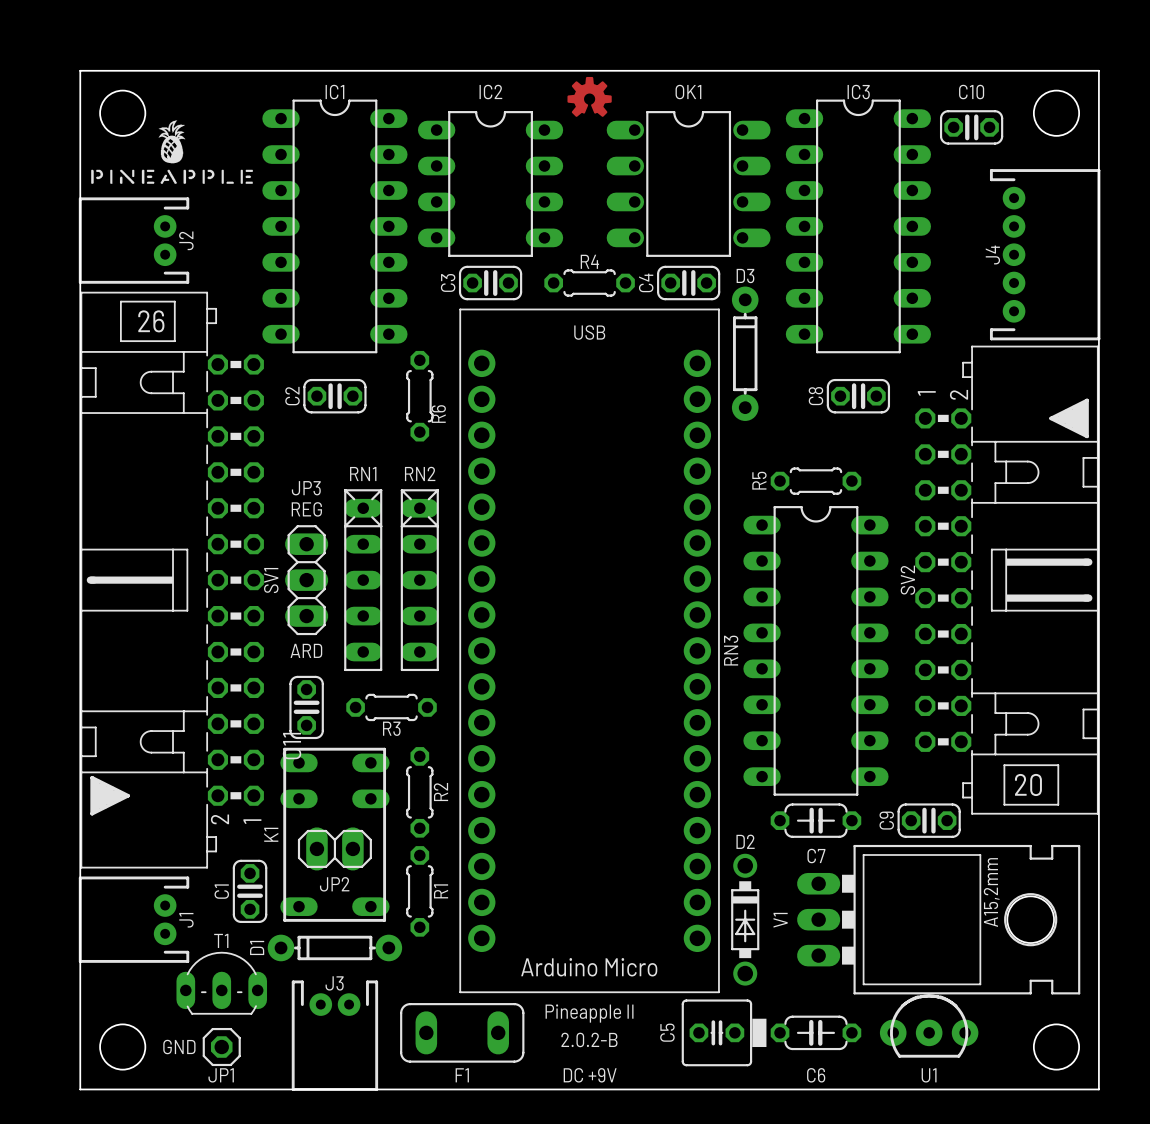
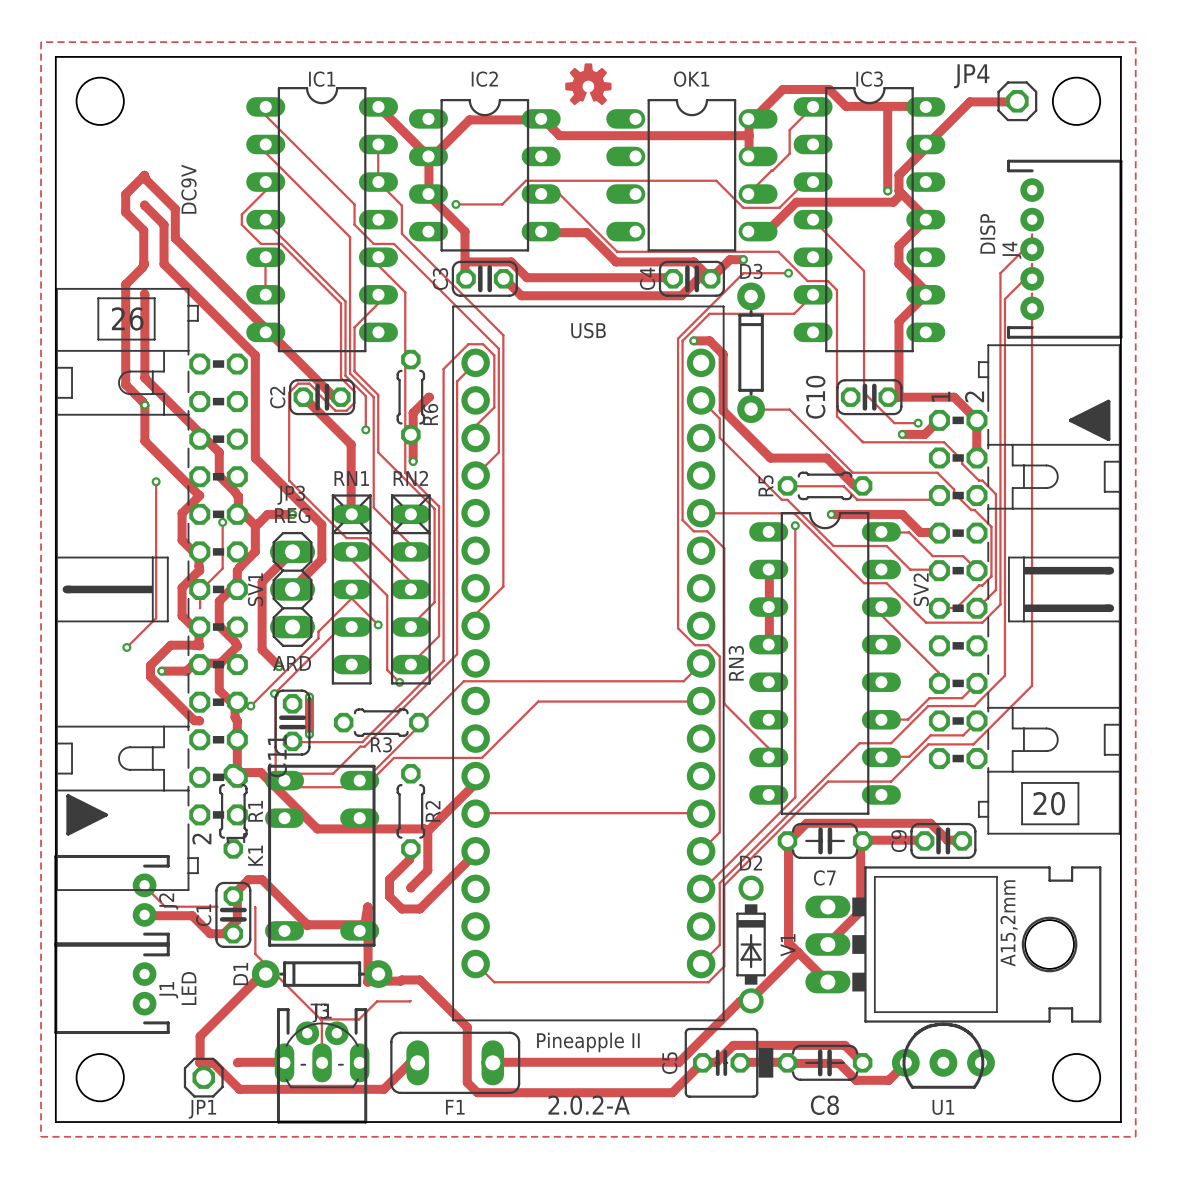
zone outline: none -> (41, 42) (1135, 42) (1135, 1136) (41, 1136) (41, 42)
track: none -> (1017, 101) (970, 101) (924, 144) (924, 149) (898, 175) (898, 190) (925, 219) (898, 246) (898, 264) (924, 290) (925, 294) (898, 321) (898, 397)
JP4: none -> (1017, 101)
track: none -> (265, 106) (266, 116) (354, 204) (354, 224) (373, 243) (393, 243) (498, 348) (498, 452) (475, 475)
track: none -> (378, 106) (428, 156)
track: none -> (813, 106) (789, 130) (789, 153) (748, 194)
track: none -> (887, 106) (887, 190)
track: none -> (925, 106) (846, 106) (829, 89) (782, 89) (753, 118) (748, 118) (748, 156)
drawing: [91, 120, 253, 184] -> none
C10: (971, 127) -> none
track: none -> (749, 135) (559, 135) (541, 118) (469, 119) (433, 155) (428, 156)
track: none -> (265, 144) (266, 153) (350, 237) (350, 373) (373, 397) (373, 507) (409, 543) (410, 551)
track: none -> (378, 144) (378, 181)
track: none -> (428, 156) (428, 194) (465, 231) (466, 278)
track: none -> (265, 182) (265, 190) (241, 214) (241, 224) (260, 243) (281, 243) (341, 303) (341, 378) (354, 391) (354, 402) (346, 410) (335, 410) (309, 383) (298, 383) (289, 392) (289, 480) (346, 538) (366, 538) (409, 580) (410, 589)
track: none -> (378, 182) (401, 205) (401, 233) (503, 335) (503, 586) (476, 613) (475, 625)
track: none -> (813, 182) (804, 183) (779, 207) (743, 207) (716, 180) (525, 180) (502, 204) (455, 204)
text: none -> DC9V (188, 189)
via: none -> (887, 190)
track: none -> (541, 194) (559, 194) (617, 251) (778, 251) (807, 281) (827, 281) (836, 290) (836, 416) (862, 442) (944, 442) (979, 480) (982, 480) (995, 494) (995, 589) (976, 608)
track: none -> (901, 193) (893, 202) (796, 202) (767, 231) (748, 231)
via: none -> (455, 204)
track: none -> (144, 204) (164, 224) (164, 264) (255, 355) (255, 458) (321, 524) (321, 559) (292, 589)
track: none -> (265, 219) (345, 301) (345, 375) (365, 396) (365, 429)
track: none -> (813, 219) (864, 270) (864, 392) (894, 423) (918, 423)
track: none -> (541, 231) (586, 232) (616, 261) (693, 261) (710, 278)
J2 position: (134, 240) -> (112, 900)
text: none -> DISP (987, 233)
track: none -> (1032, 234) (1032, 241) (1000, 273) (1000, 604) (982, 622) (926, 622) (886, 583) (864, 583) (794, 513) (701, 513)
track: none -> (265, 257) (265, 294)
track: none -> (378, 257) (379, 266) (405, 292) (405, 472) (439, 506) (439, 636) (410, 664)
track: none -> (743, 259) (729, 259) (710, 278)
via: none -> (743, 259)
track: none -> (465, 261) (511, 261) (527, 277) (673, 278)
track: none -> (1032, 264) (1032, 272) (1004, 299) (1004, 675) (974, 706) (928, 706) (891, 743) (859, 743) (719, 883) (719, 945) (701, 964)
track: none -> (788, 273) (743, 273) (678, 338) (678, 628) (694, 645) (708, 645) (719, 656) (719, 832) (701, 851)
via: none -> (788, 273)
track: none -> (503, 278) (521, 295) (681, 295) (701, 275) (710, 278)
R4: (589, 283) -> none
track: none -> (144, 293) (144, 378) (219, 452) (219, 476) (238, 496) (238, 508) (255, 525)
track: none -> (1032, 293) (1032, 685) (973, 744) (928, 744) (891, 781) (827, 781) (724, 885) (724, 966) (708, 982) (494, 982) (475, 964)
track: none -> (378, 294) (378, 303) (354, 327) (354, 371) (378, 394) (378, 452) (434, 508) (434, 602) (410, 627)
track: none -> (813, 294) (794, 313) (709, 313) (682, 340) (682, 520) (693, 531) (707, 531) (724, 548) (724, 703) (768, 747) (768, 757)
track: none -> (693, 340) (709, 340) (723, 354) (723, 410) (770, 458) (826, 458) (853, 485) (862, 485)
via: none -> (693, 340)
track: none -> (475, 362) (457, 381) (457, 654) (364, 746) (360, 746) (333, 773) (292, 773)
track: none -> (303, 397) (351, 444) (351, 514)
track: none -> (340, 397) (333, 396) (270, 332) (265, 332) (263, 326) (175, 238) (175, 208) (146, 179) (144, 175) (125, 194) (125, 212) (143, 230) (144, 264) (125, 284) (125, 384) (144, 405) (144, 441) (199, 495) (182, 513) (182, 540) (198, 557) (199, 570) (182, 587) (182, 615) (198, 632) (199, 645) (170, 645) (150, 665) (150, 676) (194, 720) (199, 720)
track: none -> (429, 397) (413, 412) (413, 461)
C8 name: C8 (815, 396) -> C10 (815, 397)
track: none -> (888, 397) (954, 397) (976, 419) (976, 457)
track: none -> (701, 400) (719, 418) (719, 437) (781, 499) (787, 499) (833, 546) (886, 546) (910, 569) (939, 570)
via: none -> (144, 405)
track: none -> (751, 409) (789, 409) (852, 472) (937, 472) (954, 489) (954, 493) (991, 526) (991, 576) (982, 585) (979, 585) (956, 608) (939, 608)
track: none -> (939, 420) (924, 434) (902, 434)
via: none -> (918, 423)
via: none -> (365, 429)
via: none -> (902, 434)
track: none -> (475, 437) (476, 425) (494, 407) (494, 355) (483, 344) (468, 344) (443, 369) (443, 660) (362, 742) (292, 741)
via: none -> (413, 461)
track: none -> (156, 481) (156, 618) (126, 647)
via: none -> (156, 481)
track: none -> (787, 485) (843, 486) (857, 499) (935, 499) (939, 495)
track: none -> (292, 514) (267, 514) (255, 525)
via: none -> (292, 514)
track: none -> (831, 514) (902, 514) (920, 532) (939, 533)
via: none -> (831, 514)
track: none -> (222, 522) (222, 568) (200, 591) (199, 608)
via: none -> (222, 522)
track: none -> (255, 525) (255, 551) (237, 570)
track: none -> (795, 525) (795, 797) (703, 888) (701, 888)
via: none -> (795, 525)
track: none -> (881, 531) (909, 532) (932, 556) (963, 556) (976, 570)
track: none -> (292, 551) (262, 582) (262, 649) (279, 666)
track: none -> (351, 551) (352, 560) (387, 595) (387, 669) (399, 682)
track: none -> (768, 569) (768, 644)
track: none -> (237, 570) (237, 583) (219, 601) (219, 626) (237, 646) (220, 663) (194, 663) (186, 671) (161, 671)
track: none -> (881, 607) (882, 615) (938, 672) (939, 683)
track: none -> (378, 624) (351, 597) (351, 589) (351, 589) (351, 598) (318, 631) (318, 638) (250, 706)
via: none -> (378, 624)
track: none -> (351, 627) (341, 627) (274, 693) (275, 775) (286, 787) (364, 787) (393, 757) (481, 757) (538, 701) (701, 701)
via: none -> (126, 647)
track: none -> (219, 663) (219, 690) (235, 706) (235, 717) (237, 720) (237, 770) (233, 773) (260, 772) (317, 828) (424, 828) (427, 831)
track: none -> (701, 663) (683, 681) (463, 681) (371, 773) (351, 773)
via: none -> (279, 666)
via: none -> (161, 671)
via: none -> (399, 682)
track: none -> (976, 683) (962, 698) (929, 698) (908, 719) (881, 719)
via: none -> (274, 693)
track: none -> (309, 697) (309, 734)
via: none -> (309, 697)
via: none -> (250, 706)
track: none -> (976, 720) (963, 735) (930, 735) (909, 756) (881, 757)
via: none -> (309, 734)
track: none -> (475, 776) (475, 783) (427, 831)
track: none -> (475, 813) (701, 813)
track: none -> (427, 831) (427, 870) (410, 888)
track: none -> (924, 840) (862, 840) (860, 844) (860, 911) (827, 944)
track: none -> (962, 840) (947, 840) (930, 823) (806, 823) (787, 840) (788, 942) (827, 982)
track: none -> (410, 848) (409, 859) (389, 879) (389, 896) (401, 908) (419, 908) (475, 851)
JP2: (334, 848) -> none
track: none -> (144, 885) (165, 906) (217, 906)
track: none -> (254, 906) (255, 954) (321, 1020) (322, 1062)
track: none -> (144, 914) (192, 915) (210, 933) (223, 933) (237, 920) (237, 890) (248, 879) (262, 879) (307, 925) (364, 924) (367, 906) (367, 982) (419, 979) (467, 1027) (467, 1082) (477, 1092) (672, 1092) (702, 1062) (716, 1062) (733, 1045) (844, 1045) (862, 1062)
R1 position: (419, 891) -> (233, 811)
J1 position: (134, 919) -> (112, 988)
track: none -> (798, 952) (751, 1000) (740, 1001) (679, 1062) (485, 1062)
track: none -> (254, 982) (200, 1036) (199, 1062) (213, 1063) (239, 1089) (383, 1089) (410, 1062)
text: none -> LED (188, 988)
text: Arduino Micro (589, 967) -> none
track: none -> (410, 1000) (377, 1001) (359, 1019) (321, 1020)
T1 position: (221, 983) -> (322, 1055)
track: none -> (237, 1062) (284, 1062)
track: none -> (740, 1062) (839, 1063) (856, 1080) (888, 1080) (905, 1062)
text: 2.0.2-B (589, 1039) -> none
text: GND (179, 1047) -> none
text: DC +9V (590, 1075) -> 2.0.2-A (589, 1105)
C6 name: C6 (816, 1075) -> C8 (824, 1105)

